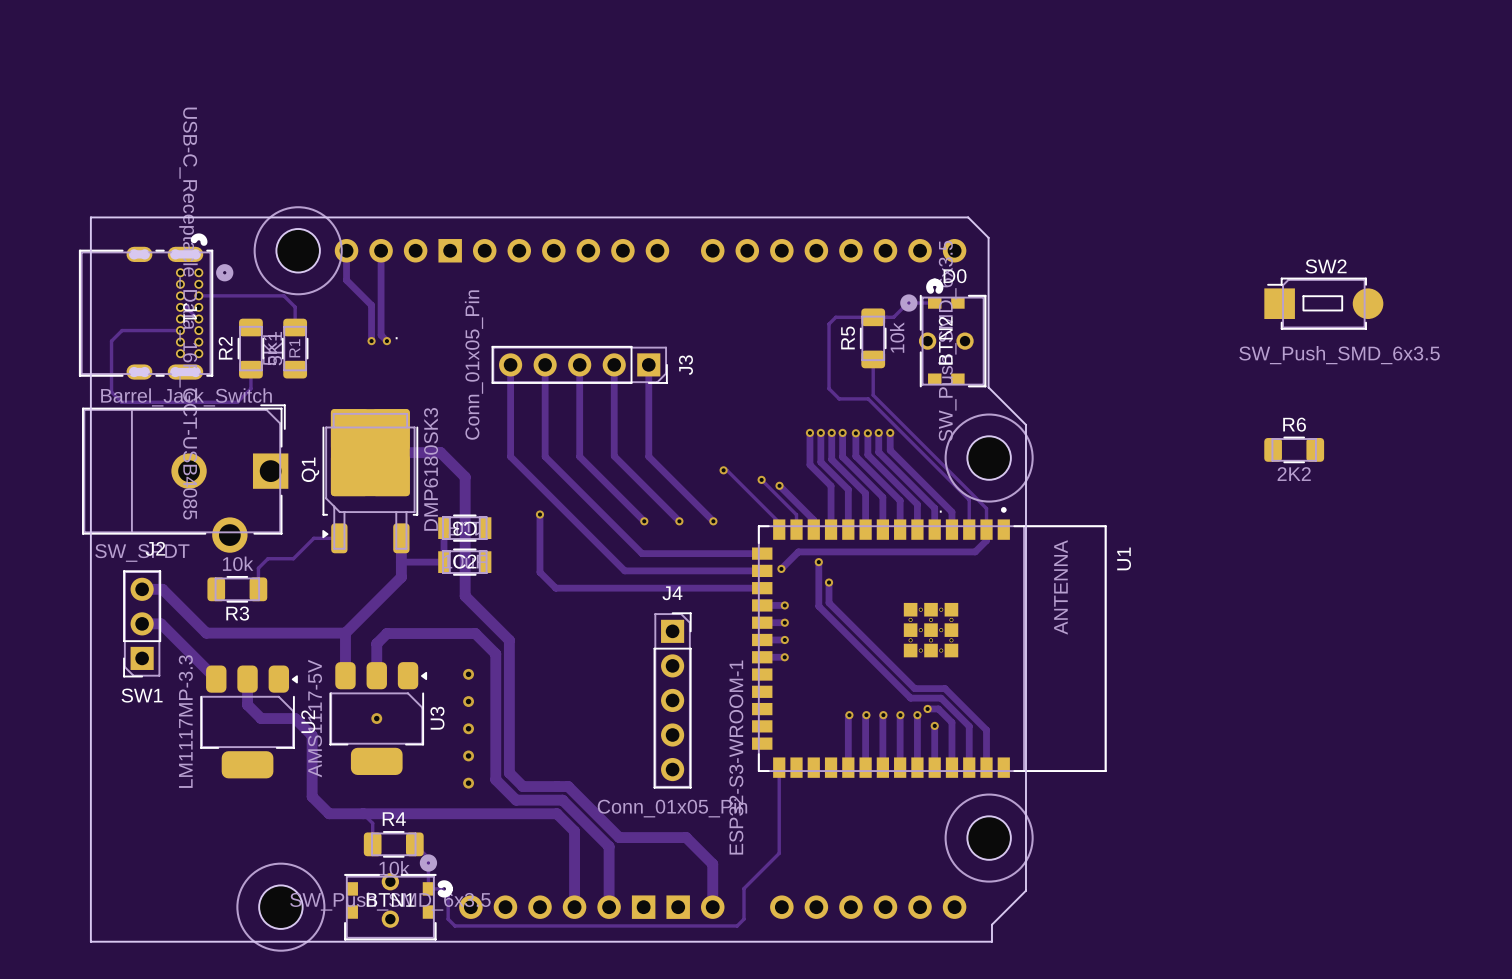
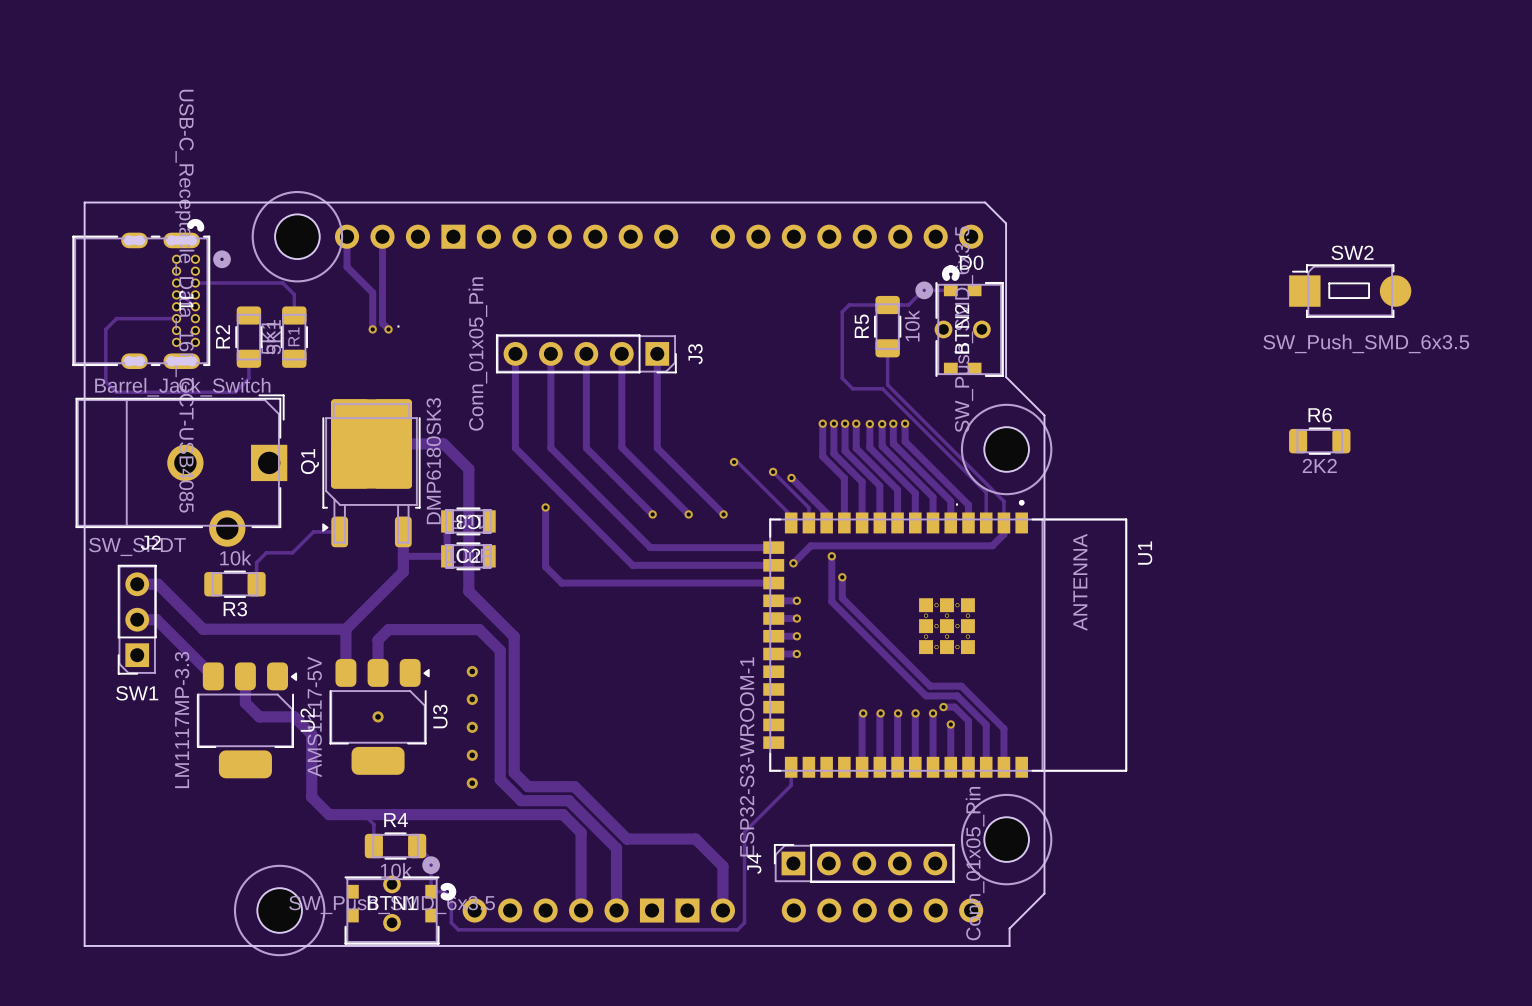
J4 rotation: 0° (672, 700) -> 90° counterclockwise (864, 863)
J4 position: (672, 700) -> (864, 863)
track: (779, 785) (779, 853) (744, 888) (744, 919) (737, 925) (727, 925) -> (791, 785) (744, 832) (744, 922) (737, 929)

